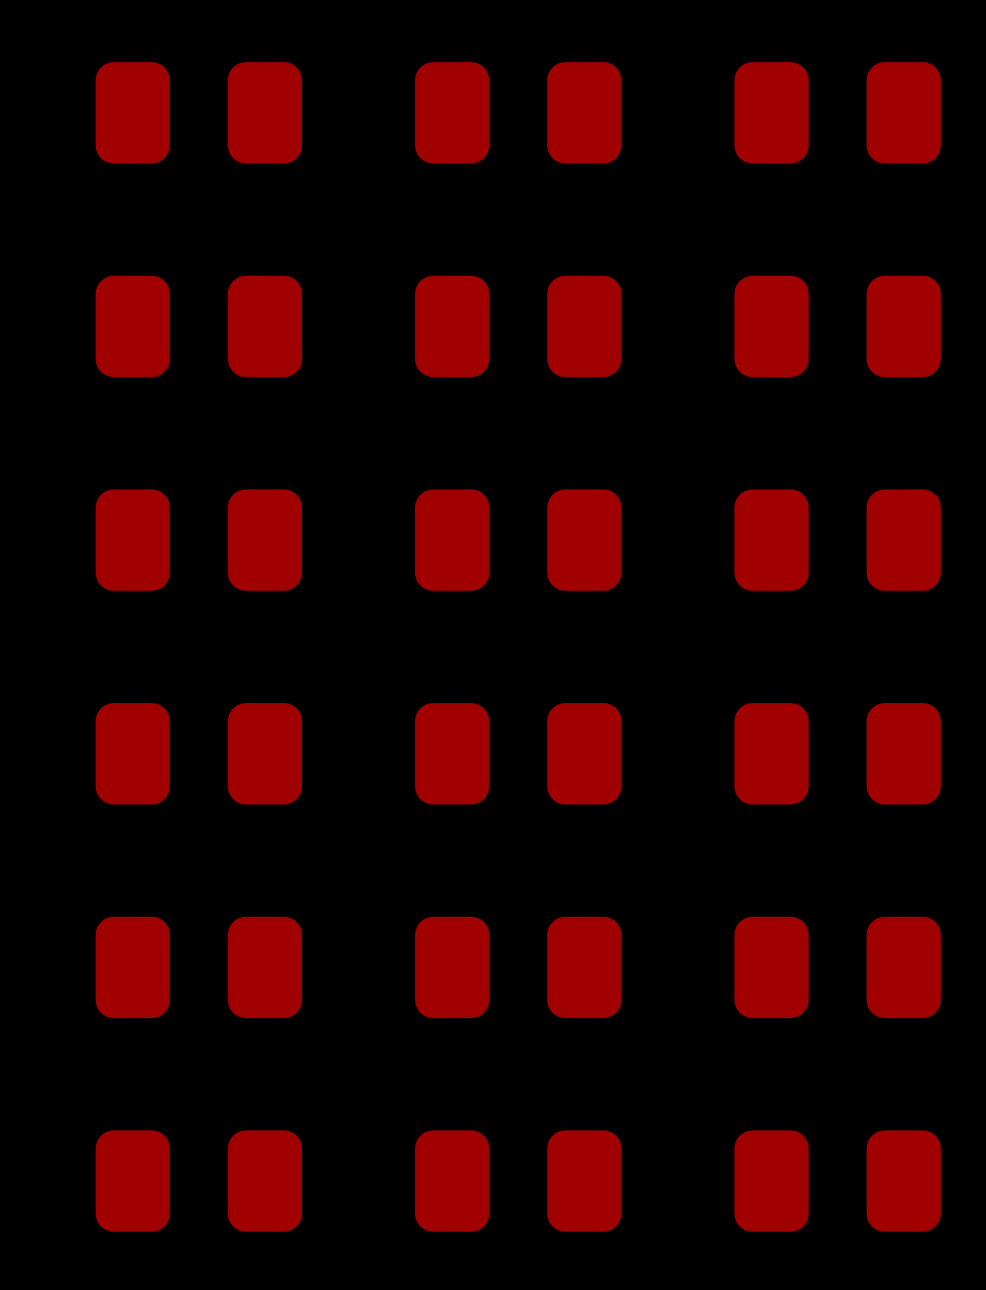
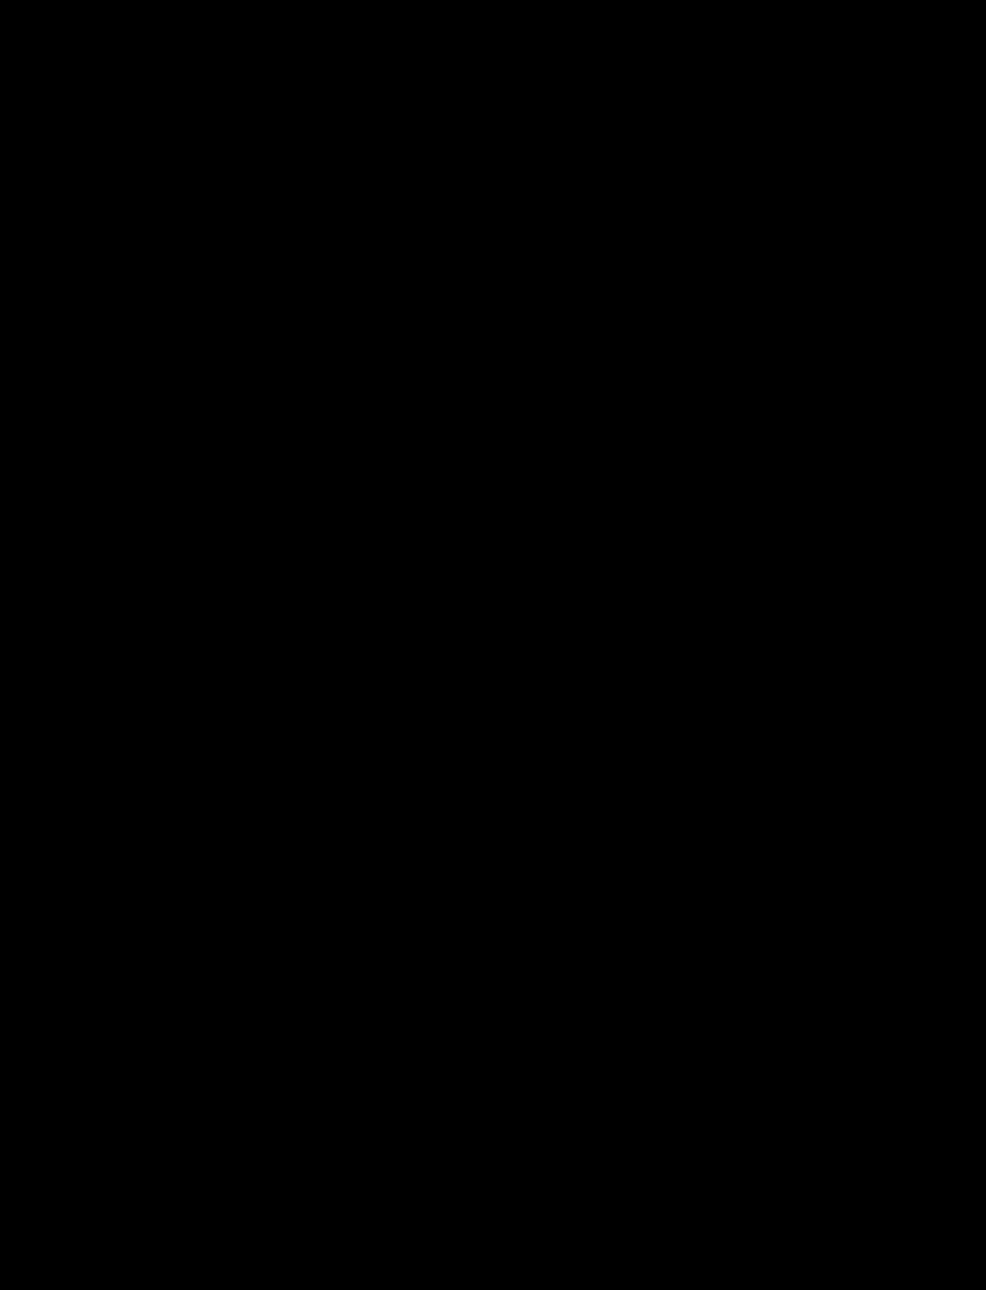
part: (198, 112) -> none
part: (518, 112) -> none
part: (837, 112) -> none
part: (198, 326) -> none
part: (518, 326) -> none
part: (837, 326) -> none
part: (198, 540) -> none
part: (518, 540) -> none
part: (837, 540) -> none
part: (198, 753) -> none
part: (518, 753) -> none
part: (837, 753) -> none
part: (198, 967) -> none
part: (518, 967) -> none
part: (837, 967) -> none
part: (198, 1181) -> none
part: (518, 1181) -> none
part: (837, 1181) -> none

